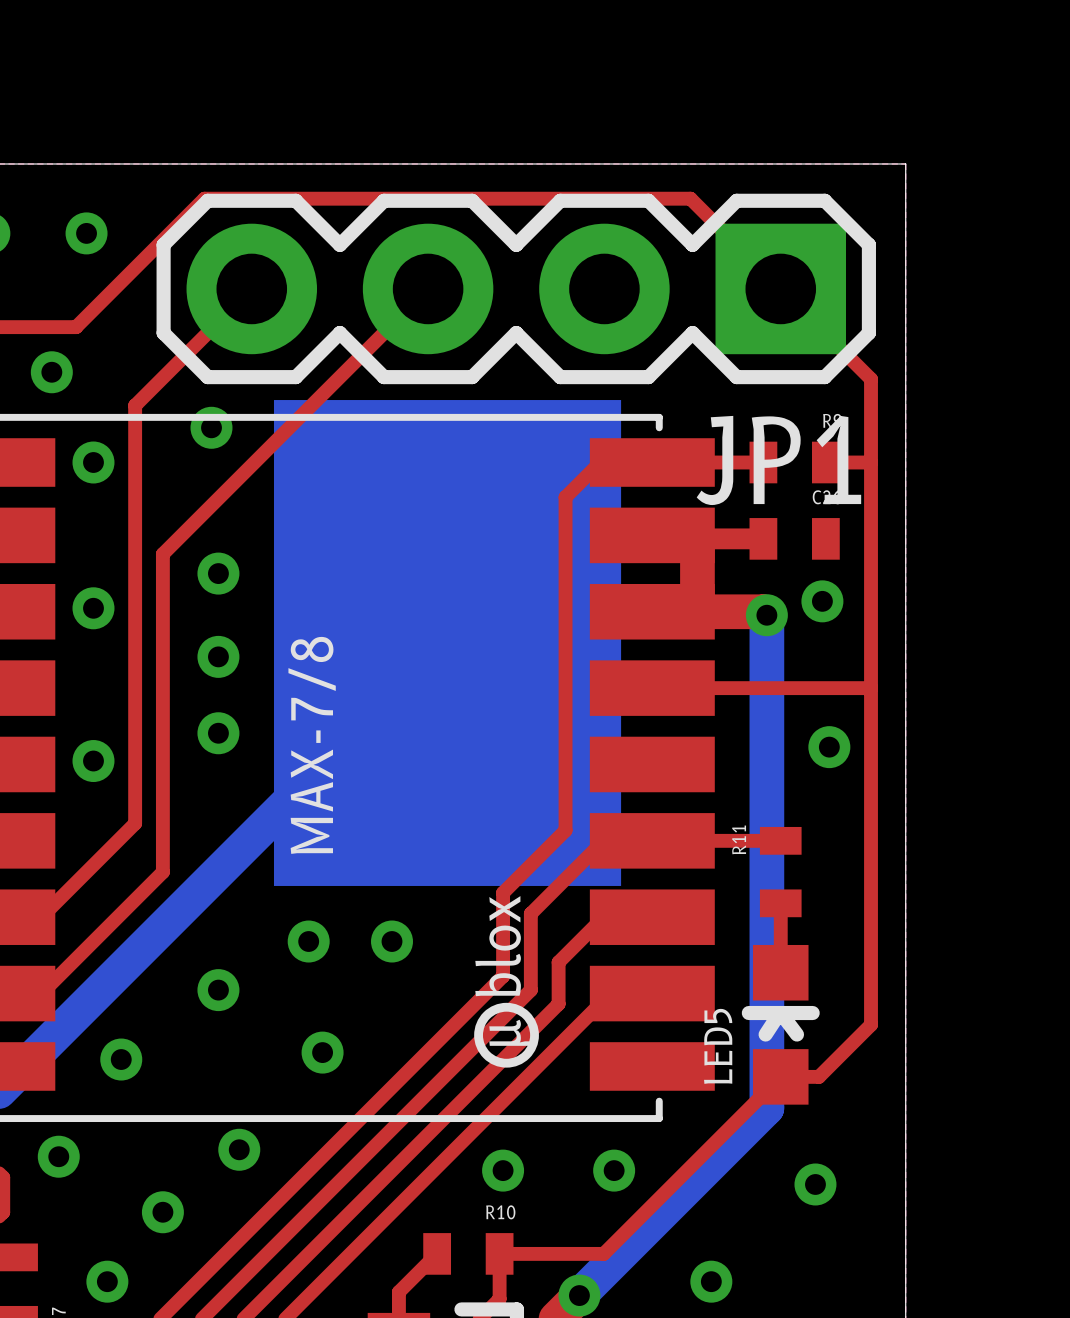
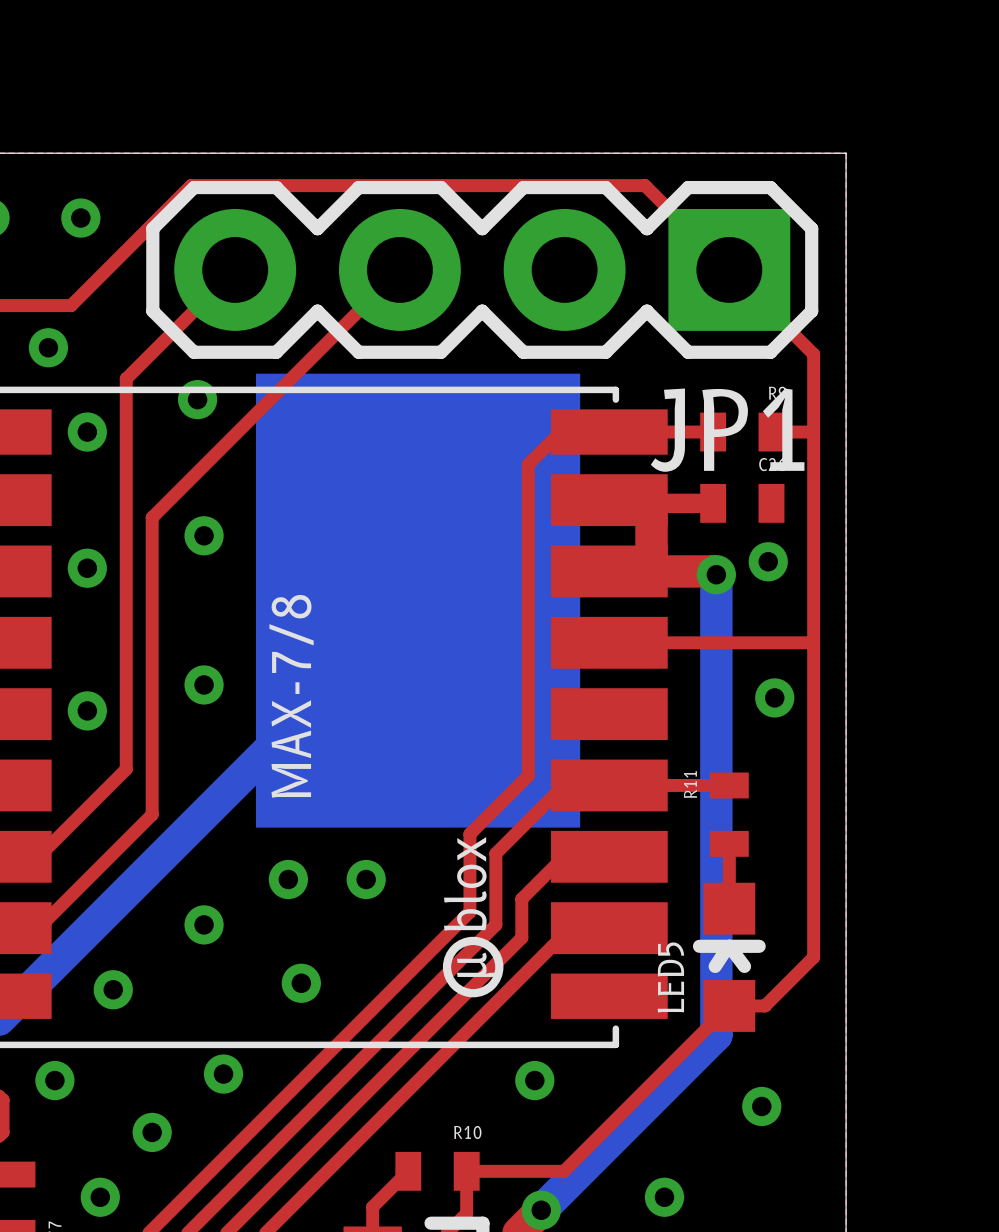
via: (218, 656) -> none
via: (503, 1170) -> none
via position: (614, 1170) -> (534, 1080)

